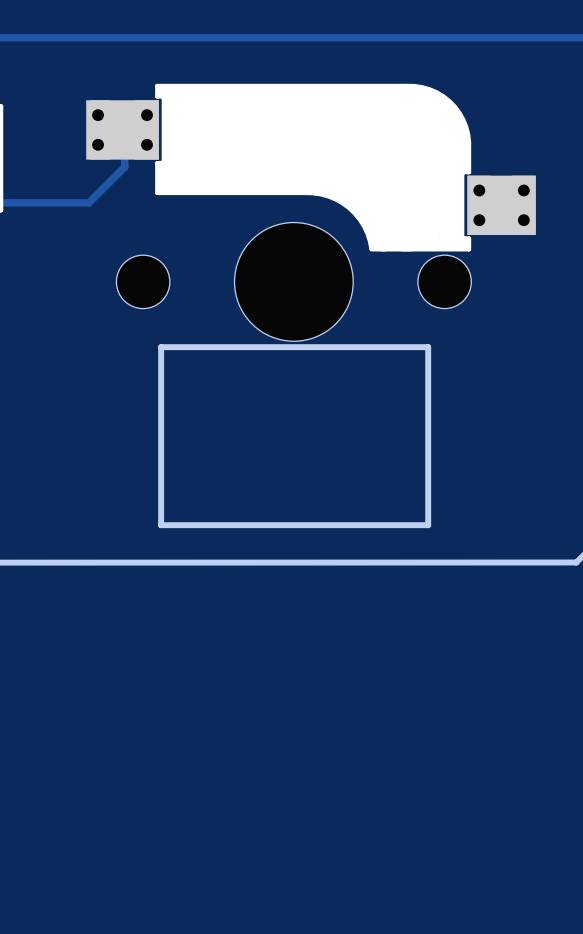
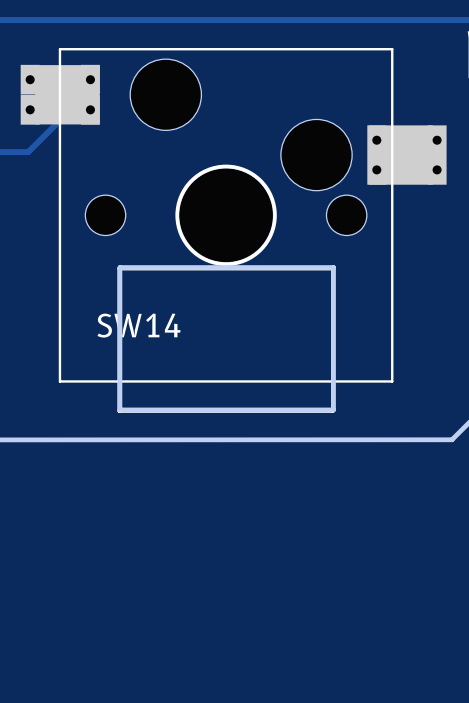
track: (124, 129) (124, 167) (88, 202) (46, 202) -> (59, 120) (28, 152)
part: (310, 212) -> none
SW14: none -> (233, 230)

